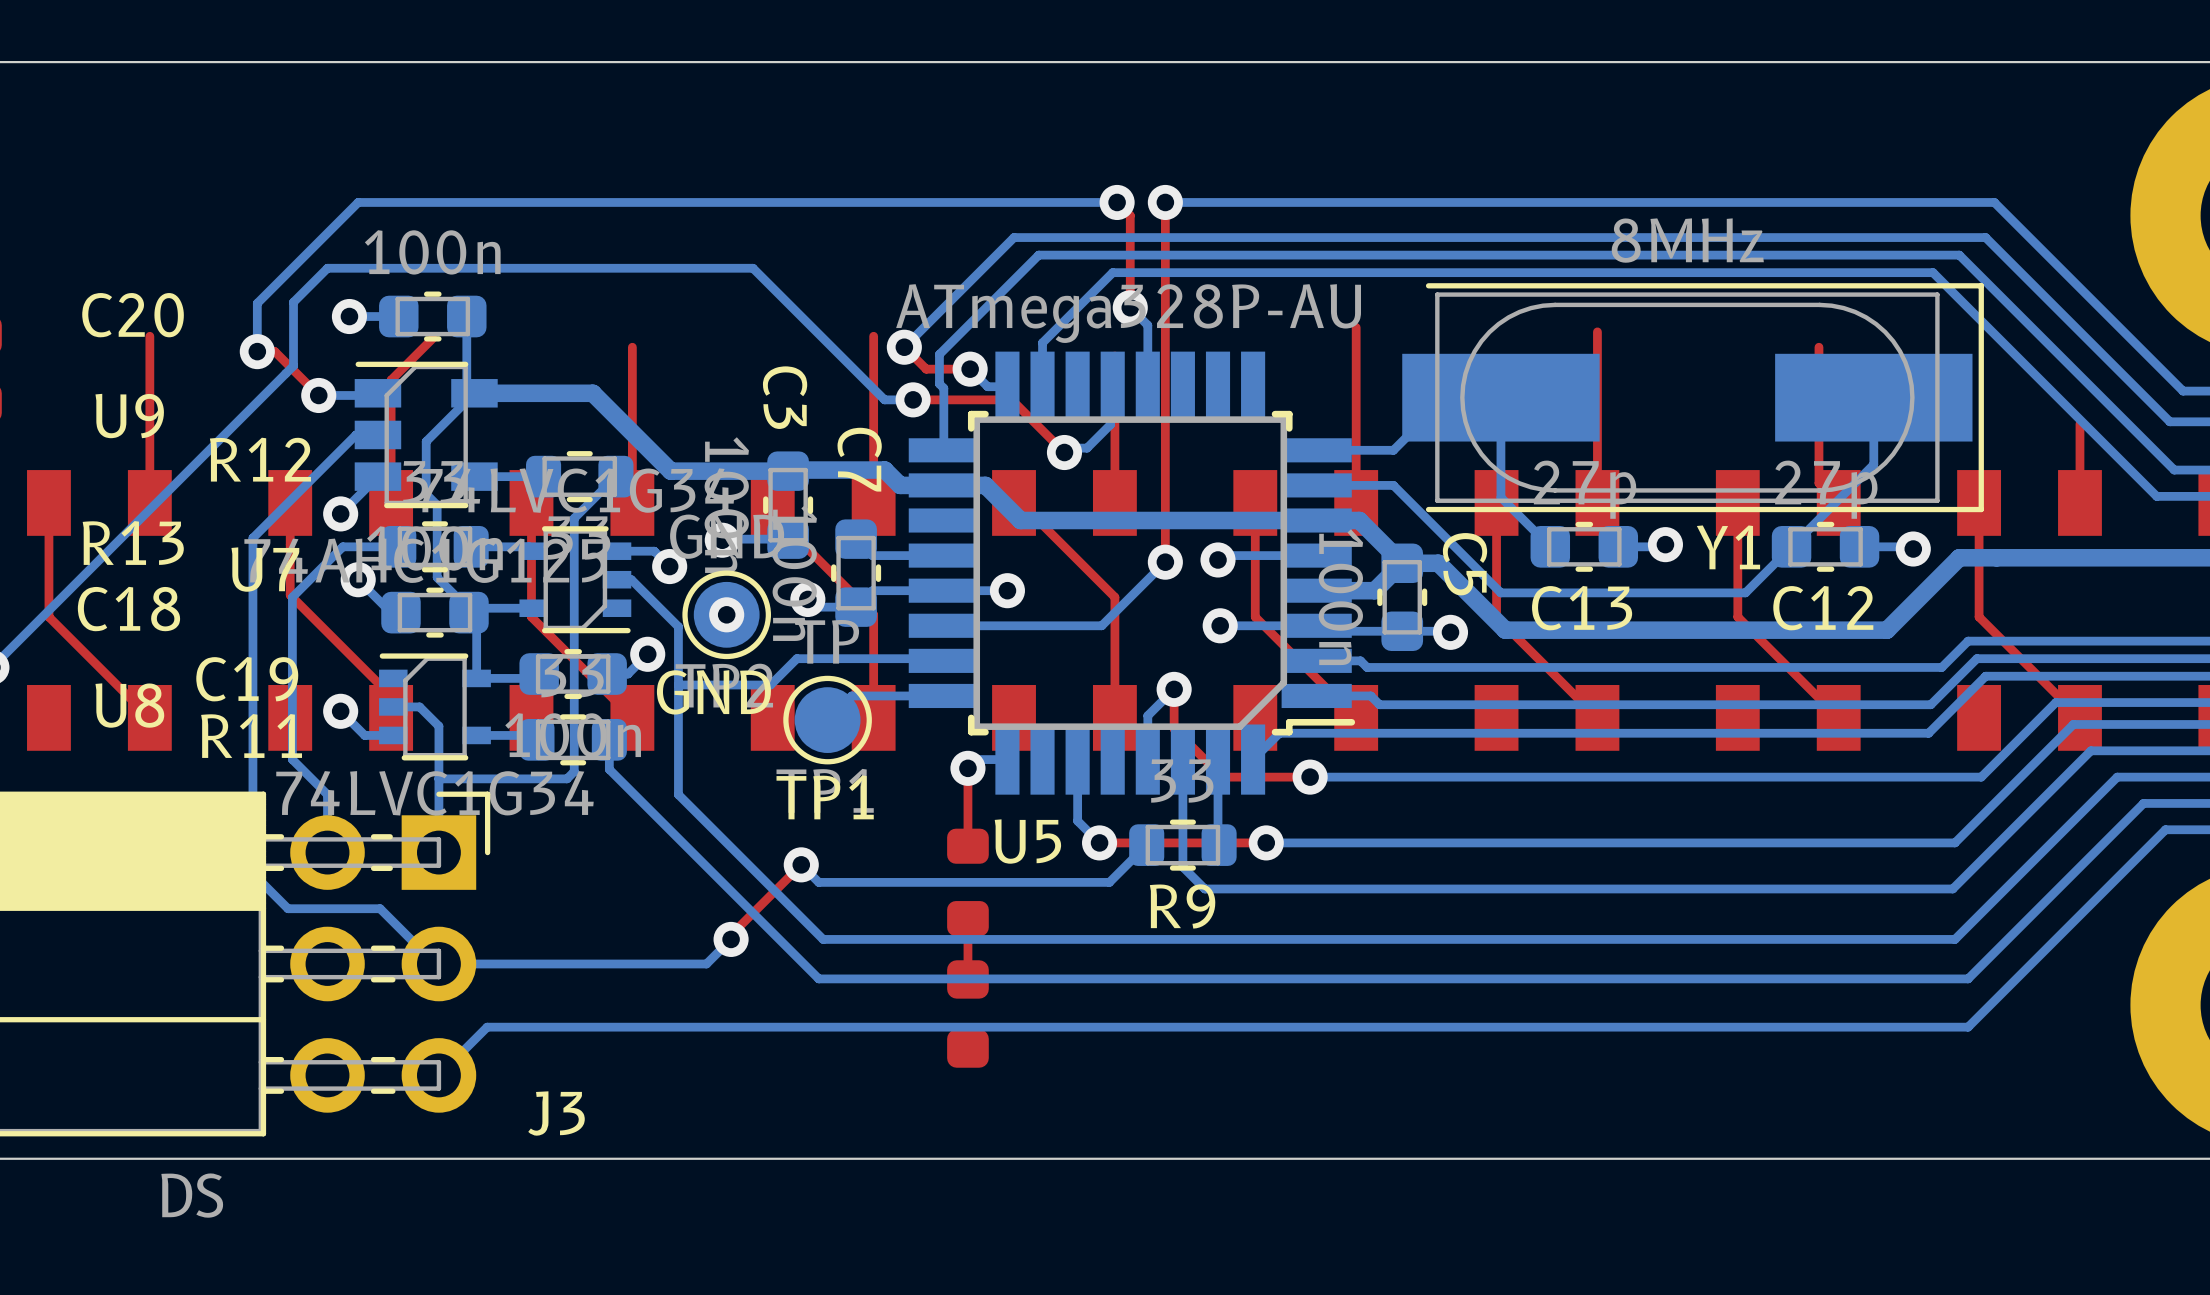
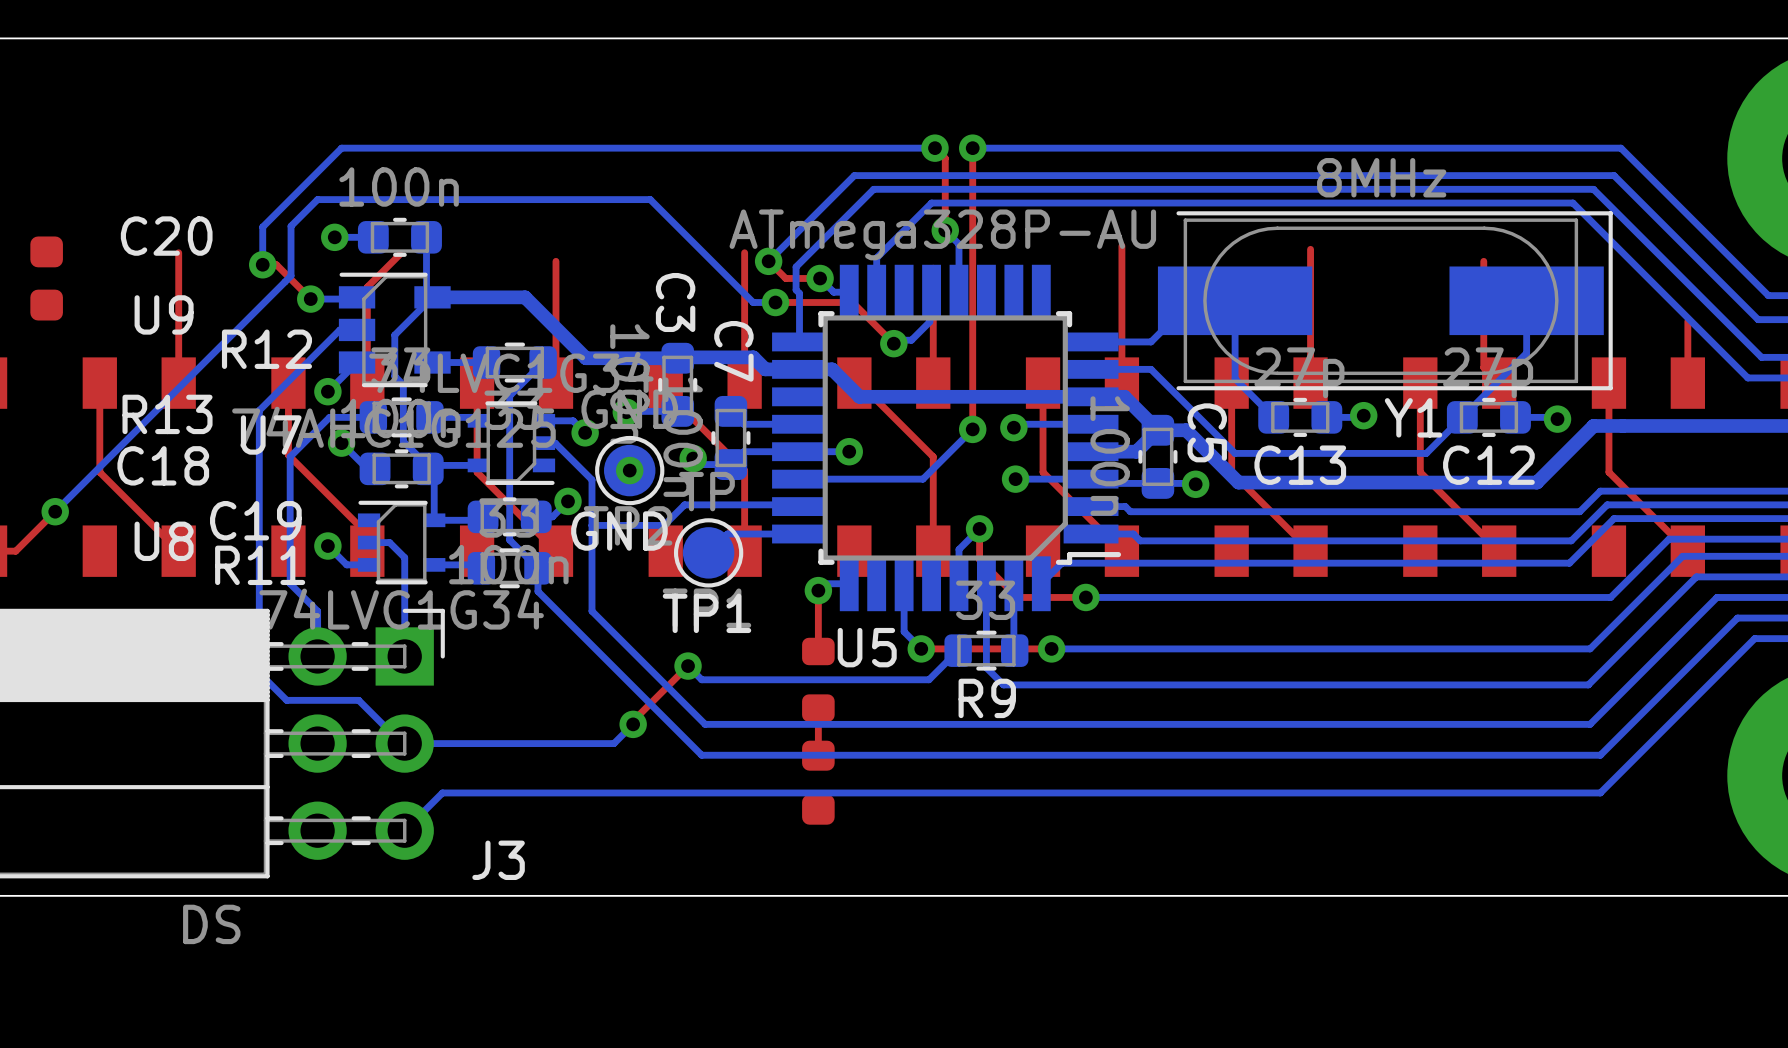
bottom track: (574, 518) (574, 771) (567, 778) (438, 778) -> (510, 395) (509, 540) (537, 568)

